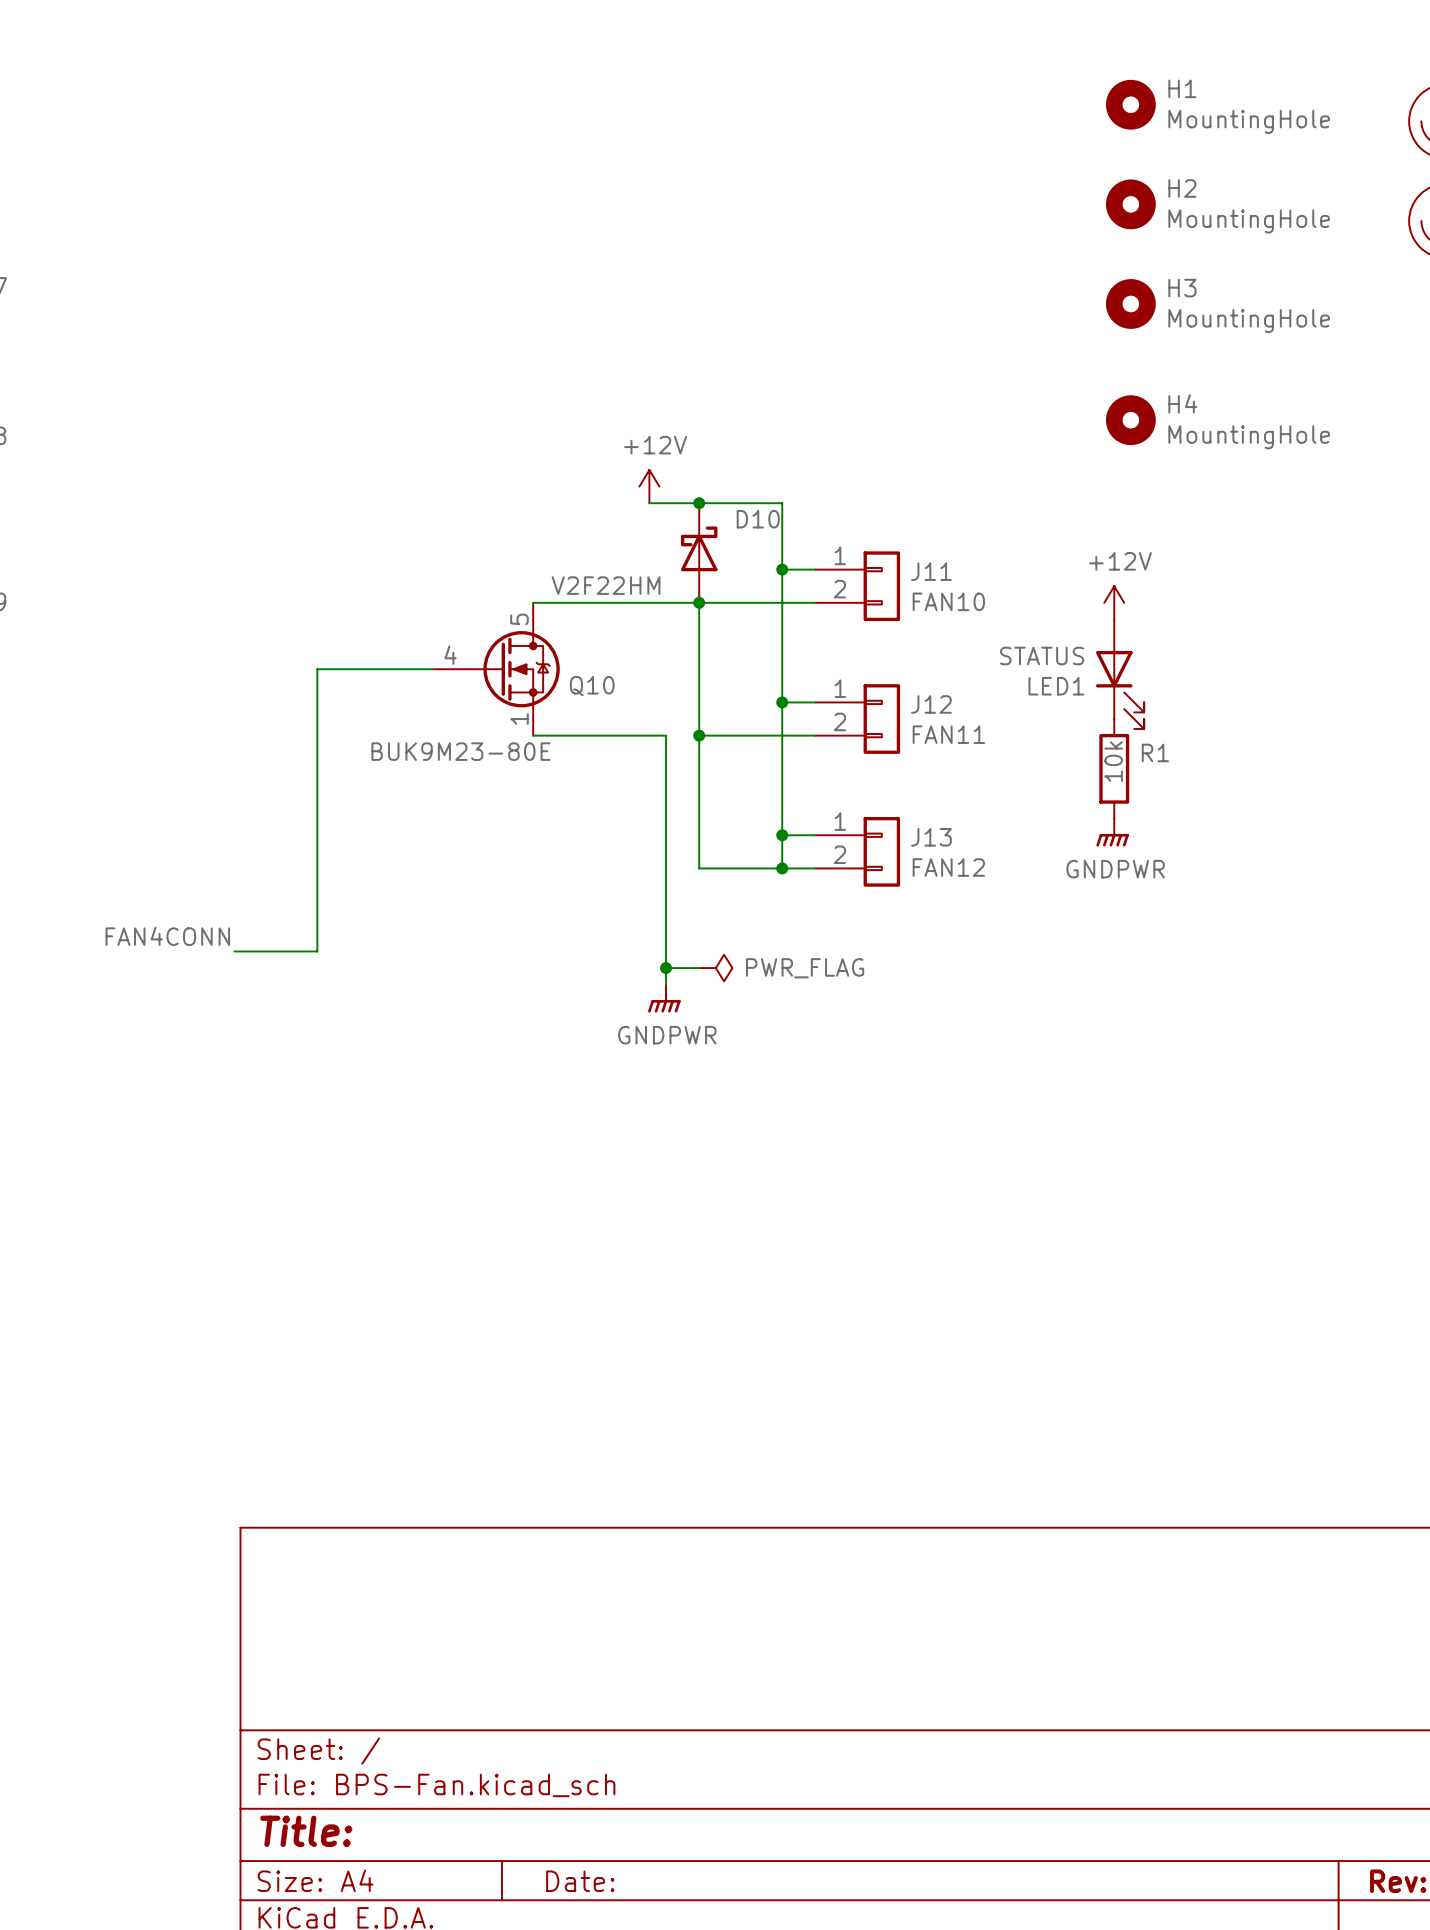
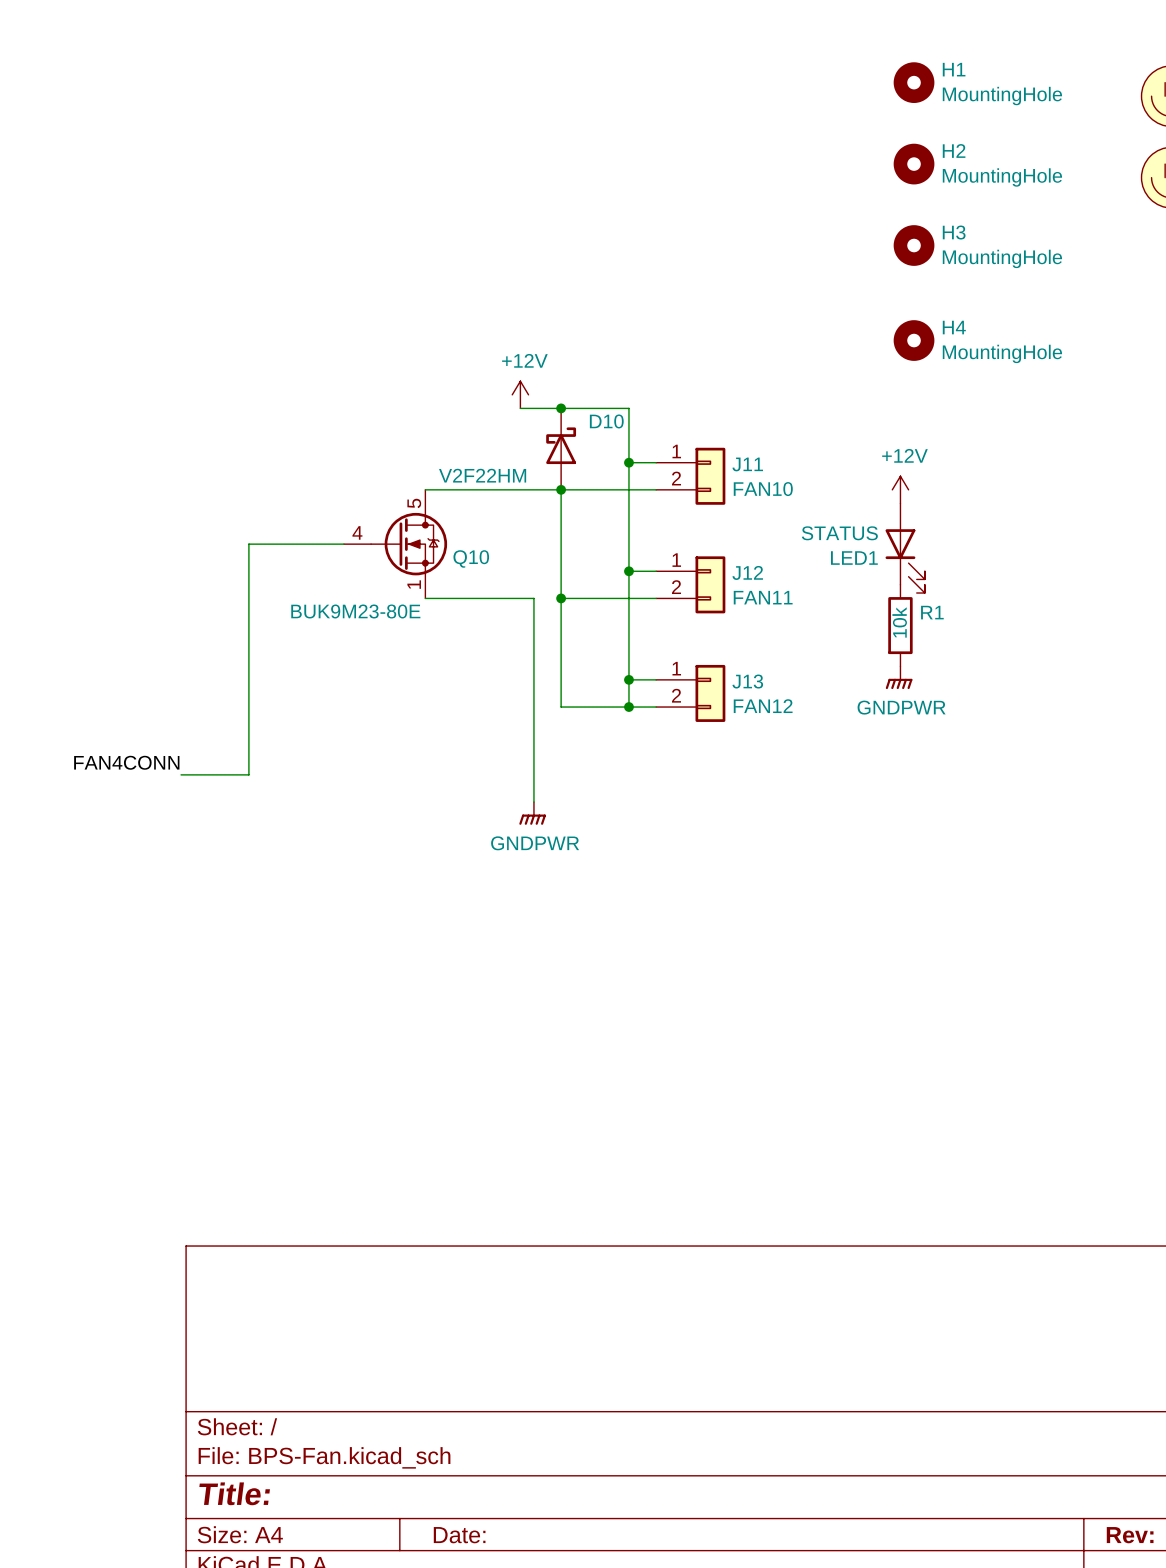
wire: (666, 968) (699, 968) -> none
junction: (666, 968) -> none
power symbol: PWR_FLAG (715, 968) -> none

